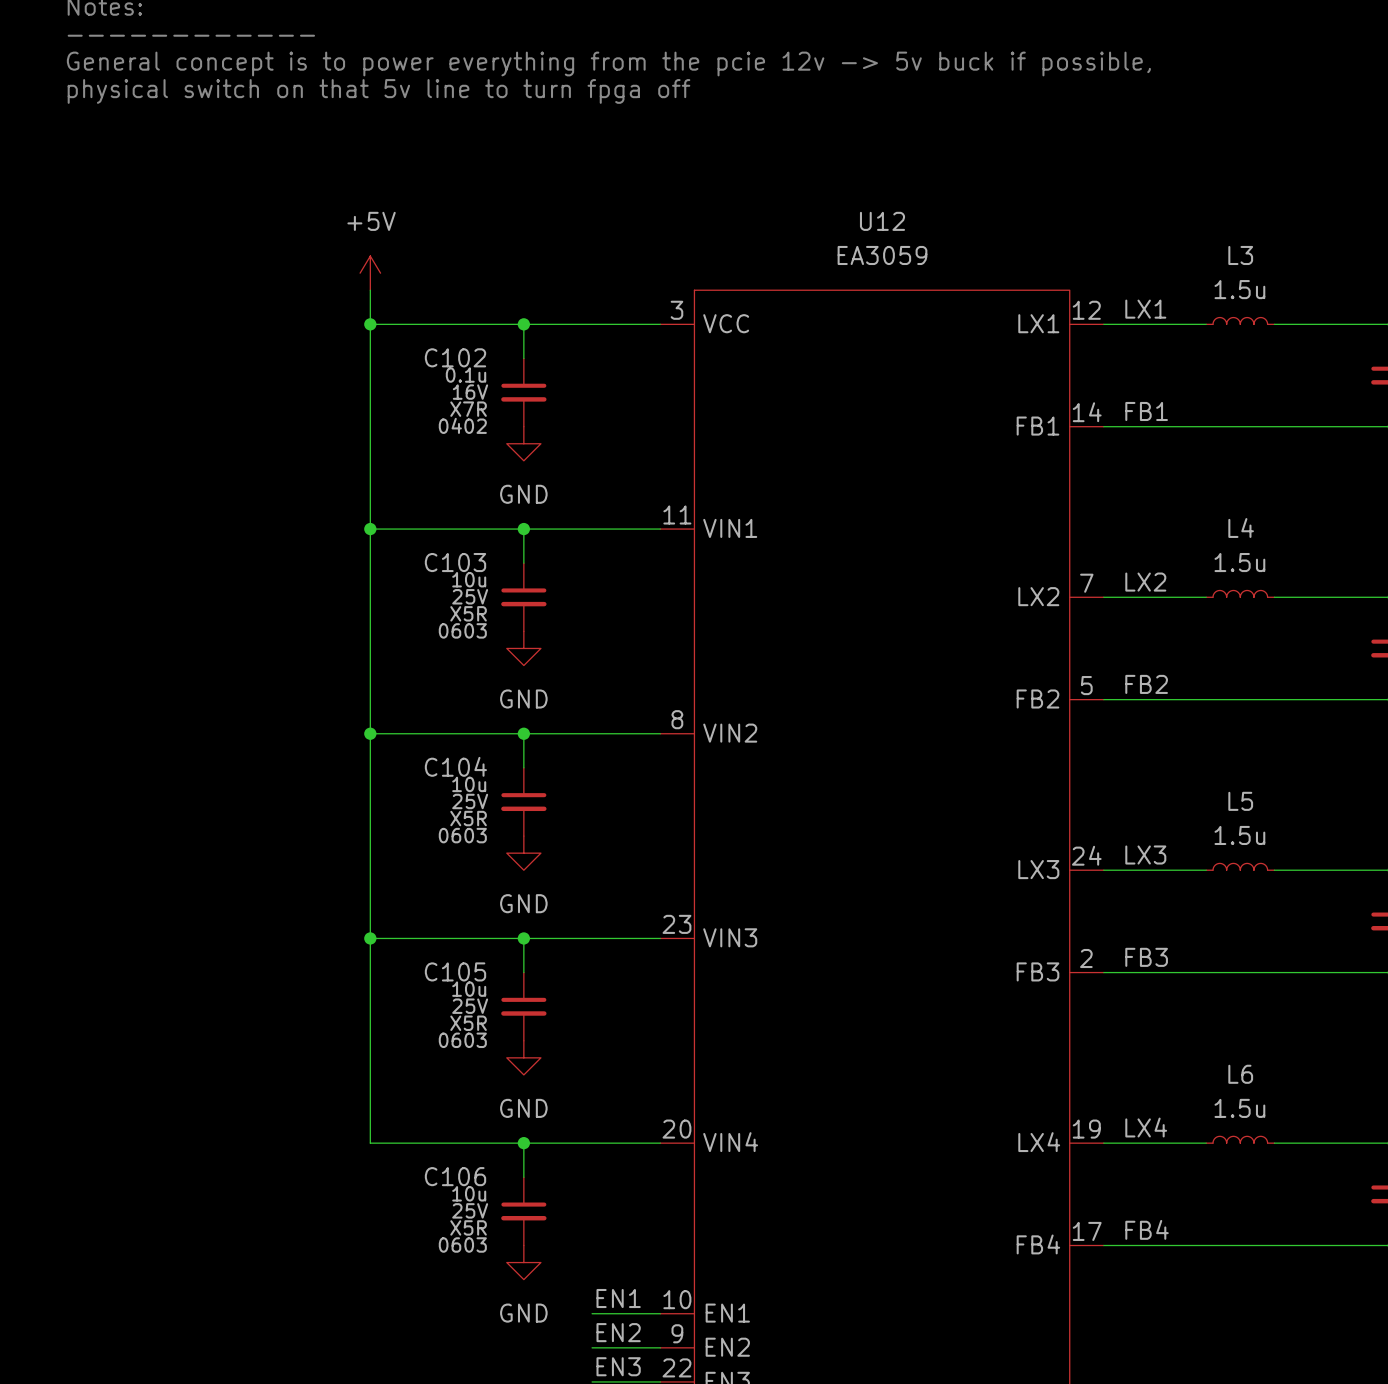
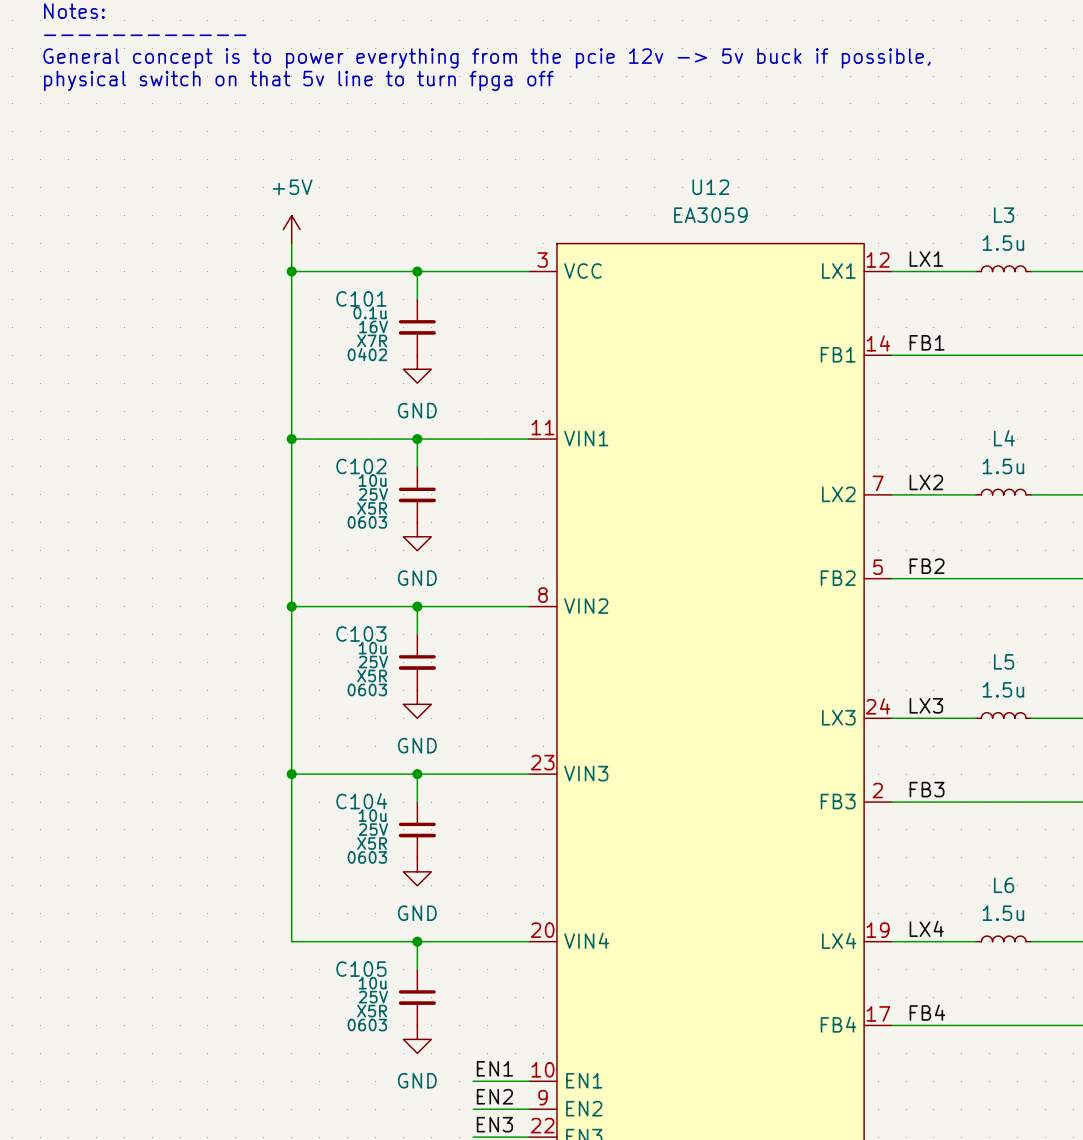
C102 name: C102 (455, 357) -> C101 (361, 298)
C103 name: C103 (455, 562) -> C102 (361, 466)
C104 name: C104 (455, 766) -> C103 (361, 633)
C105 name: C105 (455, 971) -> C104 (361, 801)
C106 name: C106 (455, 1176) -> C105 (361, 969)

